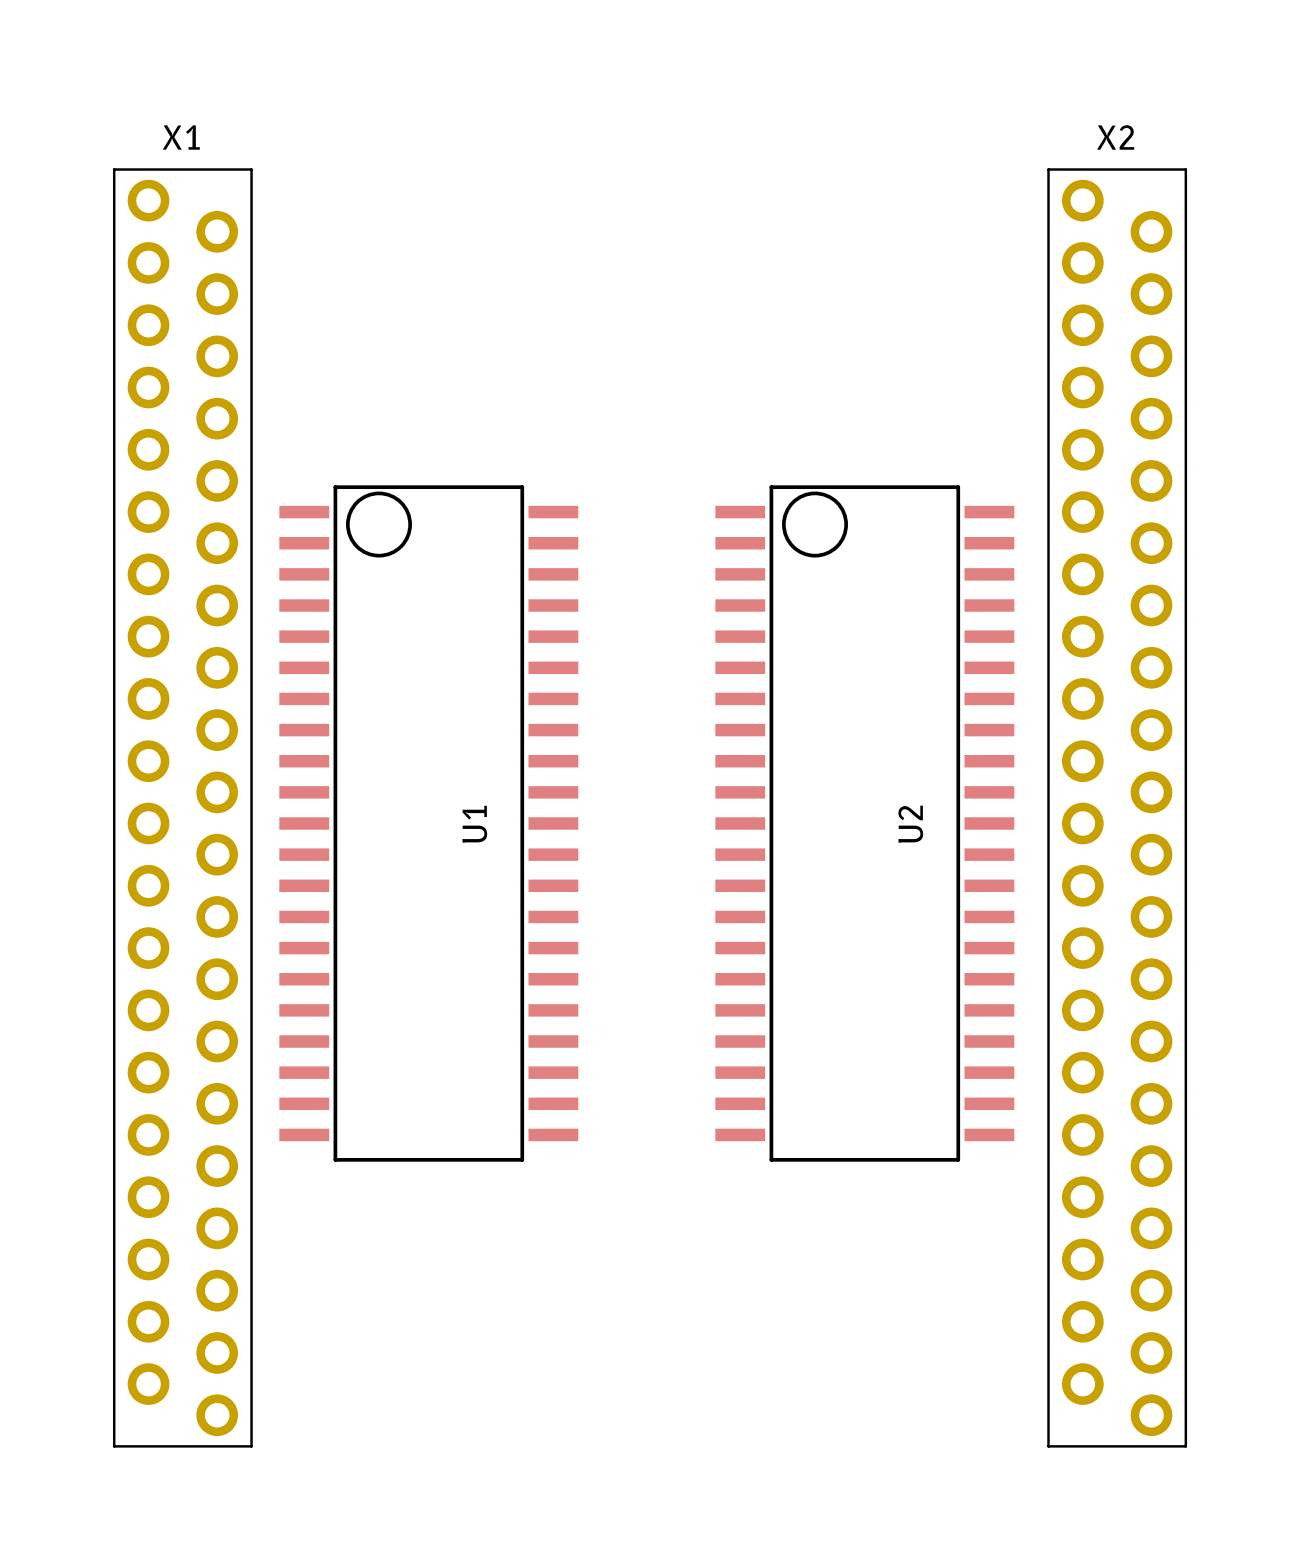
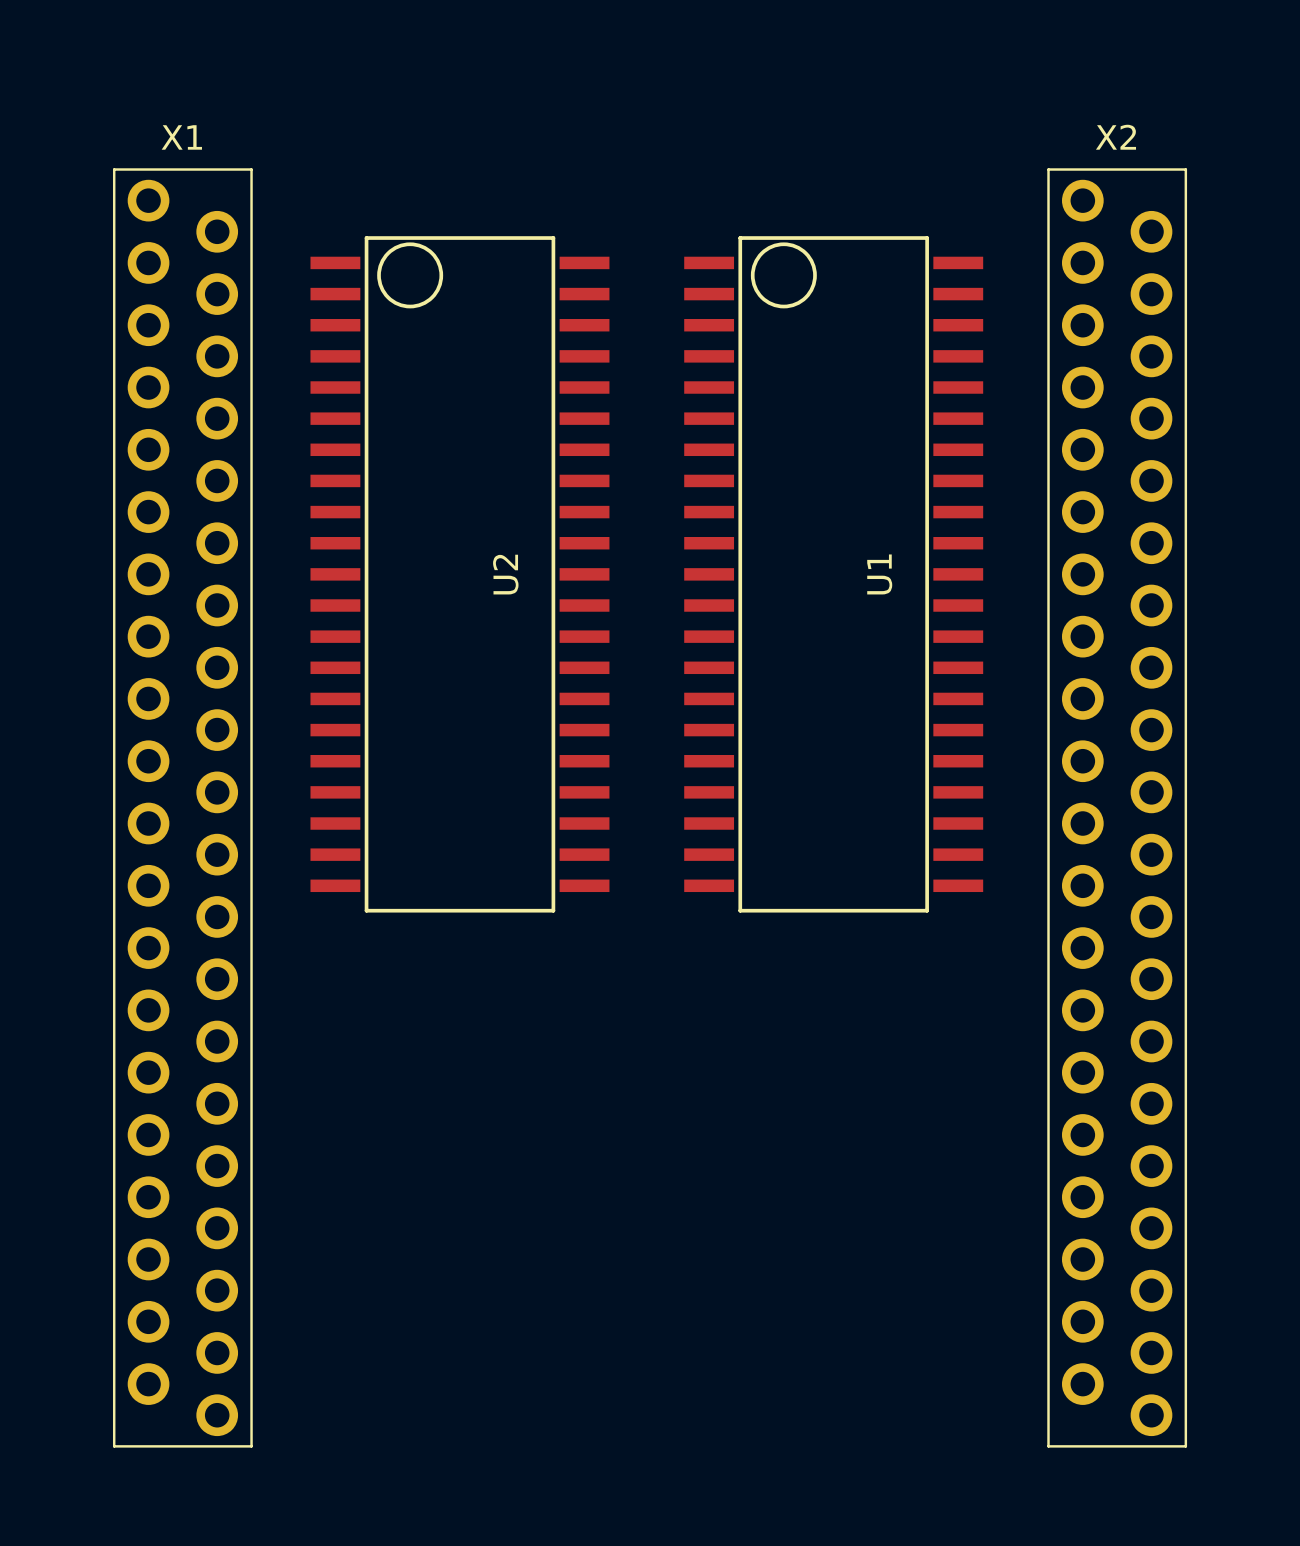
U1 position: (428, 823) -> (833, 574)
U2 position: (864, 823) -> (459, 574)

